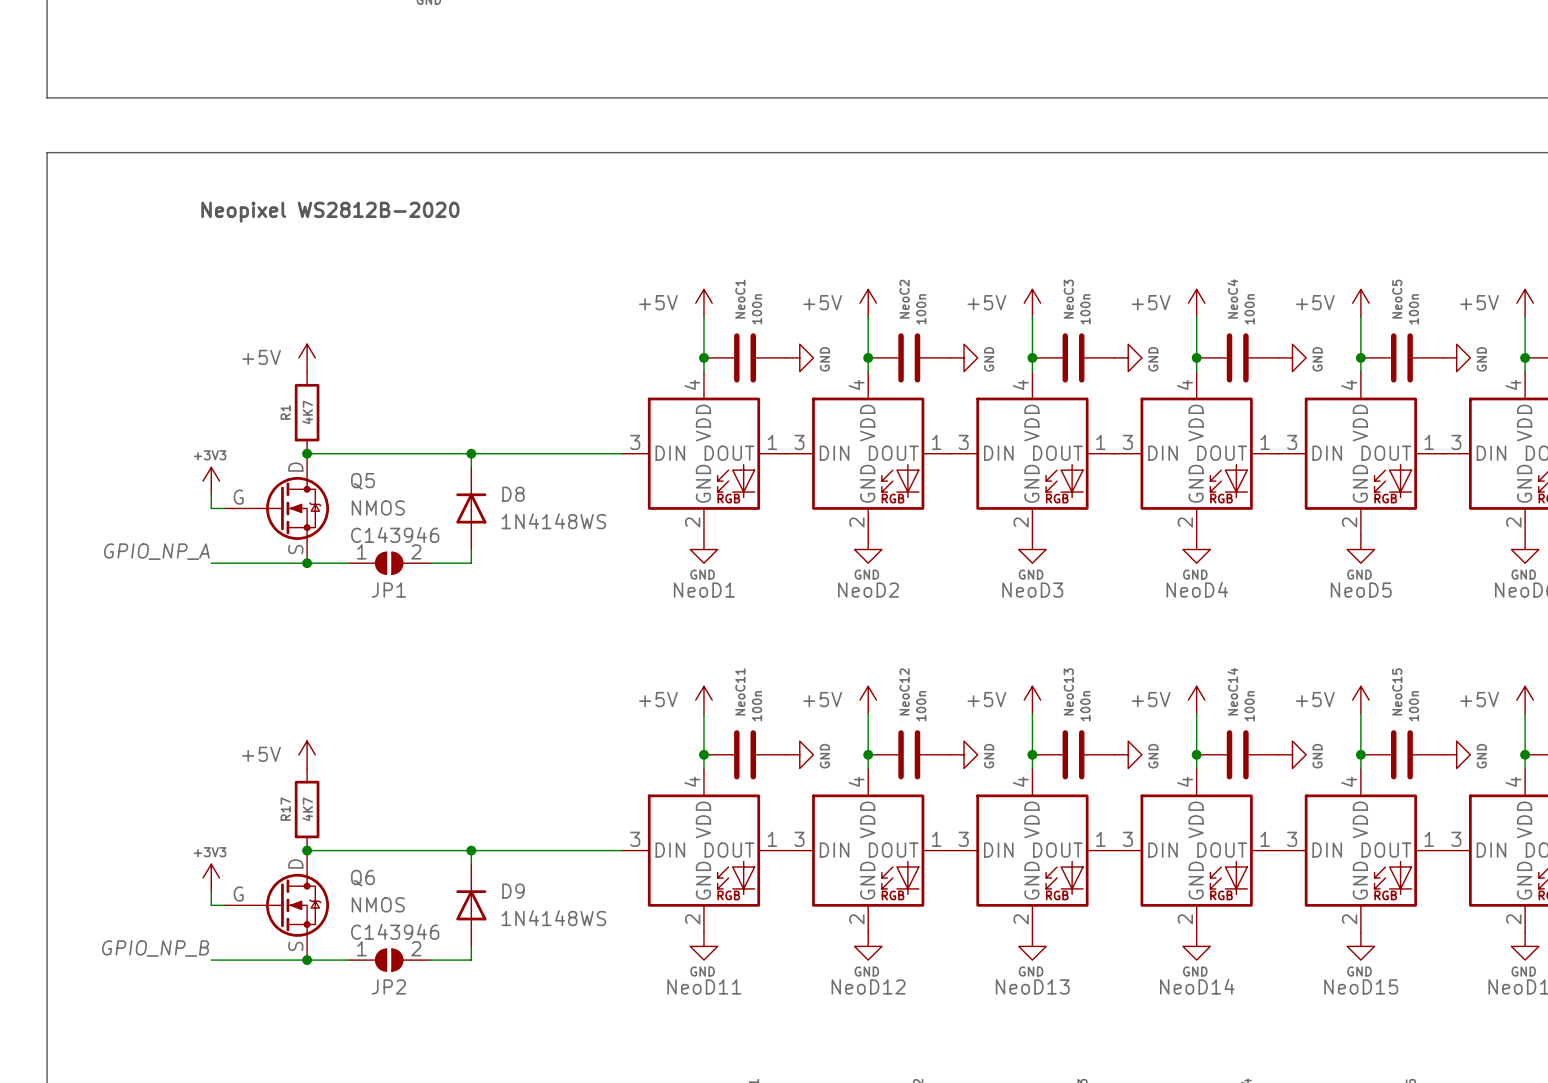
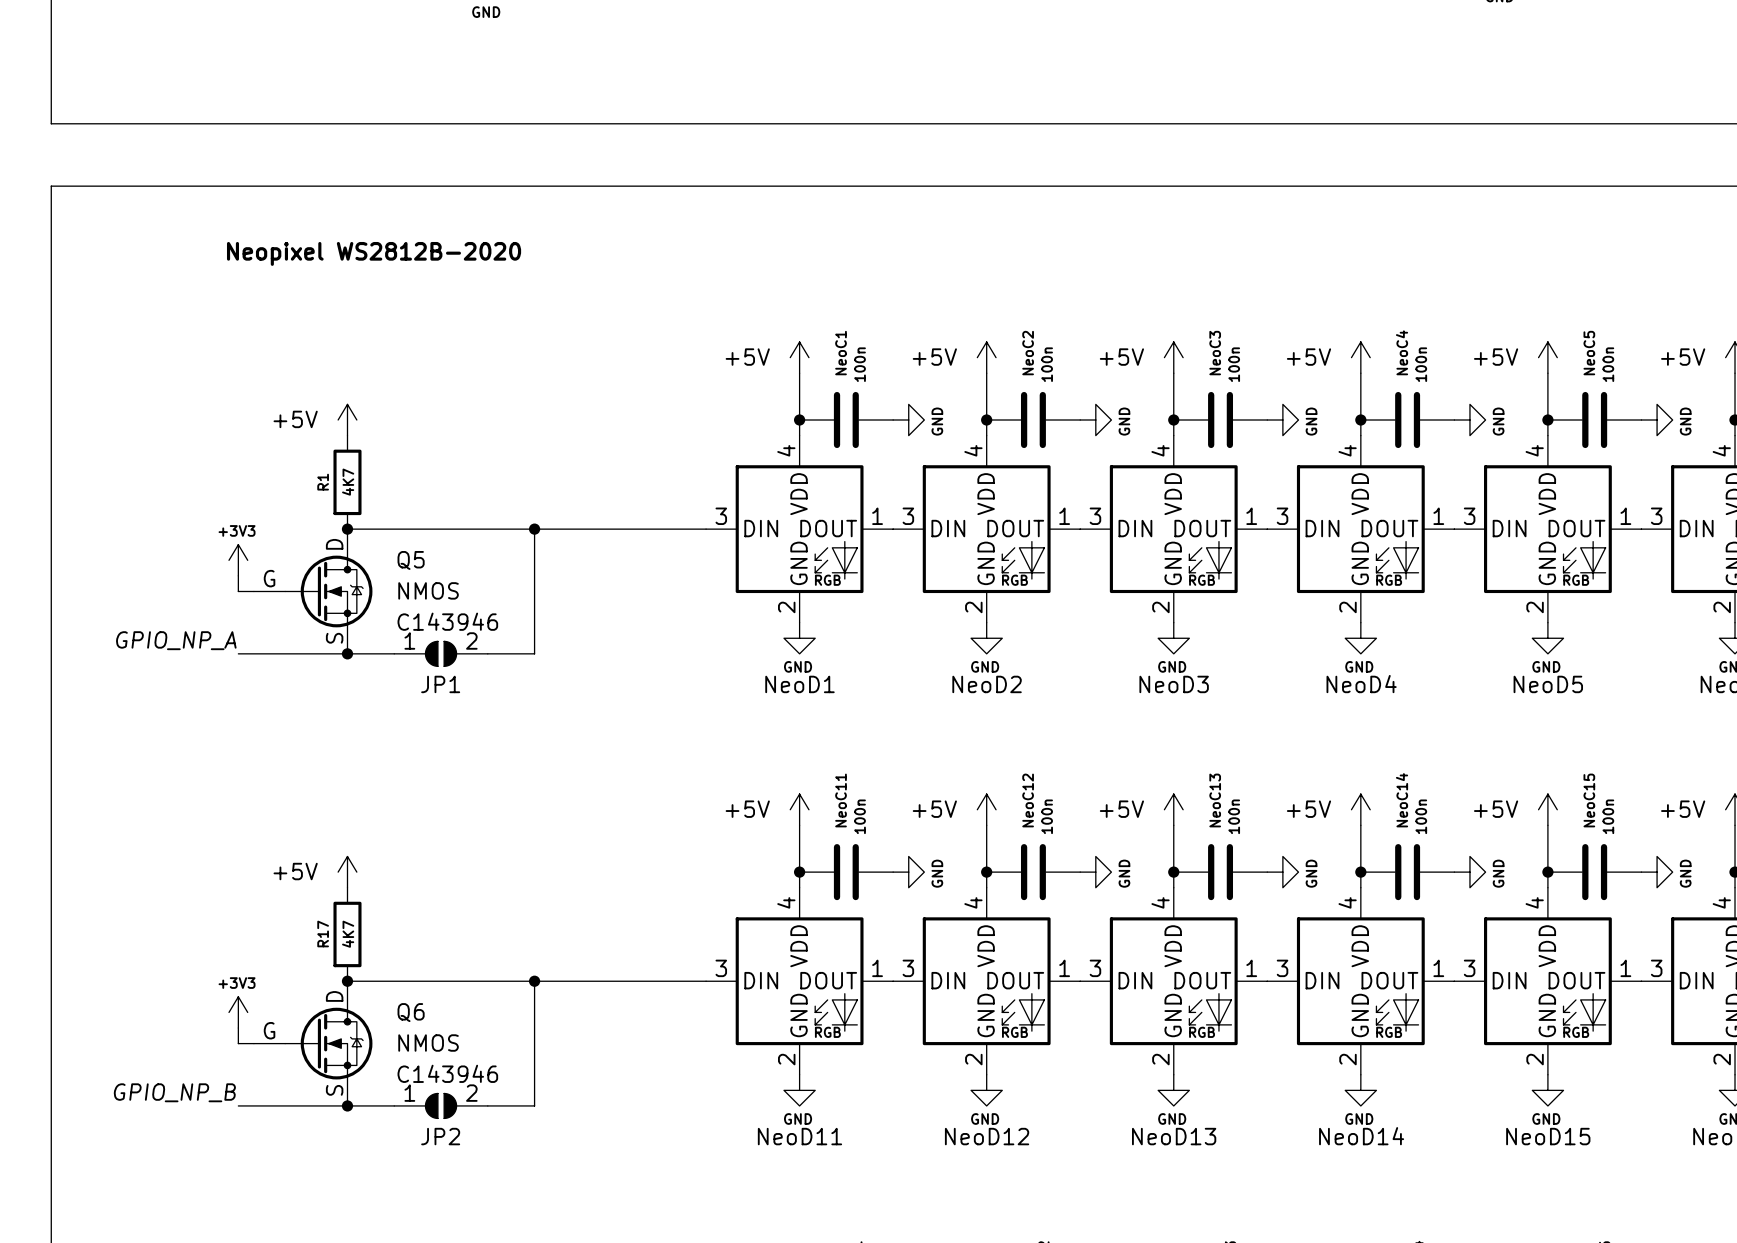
D8: 1N4148WS (471, 508) -> none
D9: 1N4148WS (471, 905) -> none

